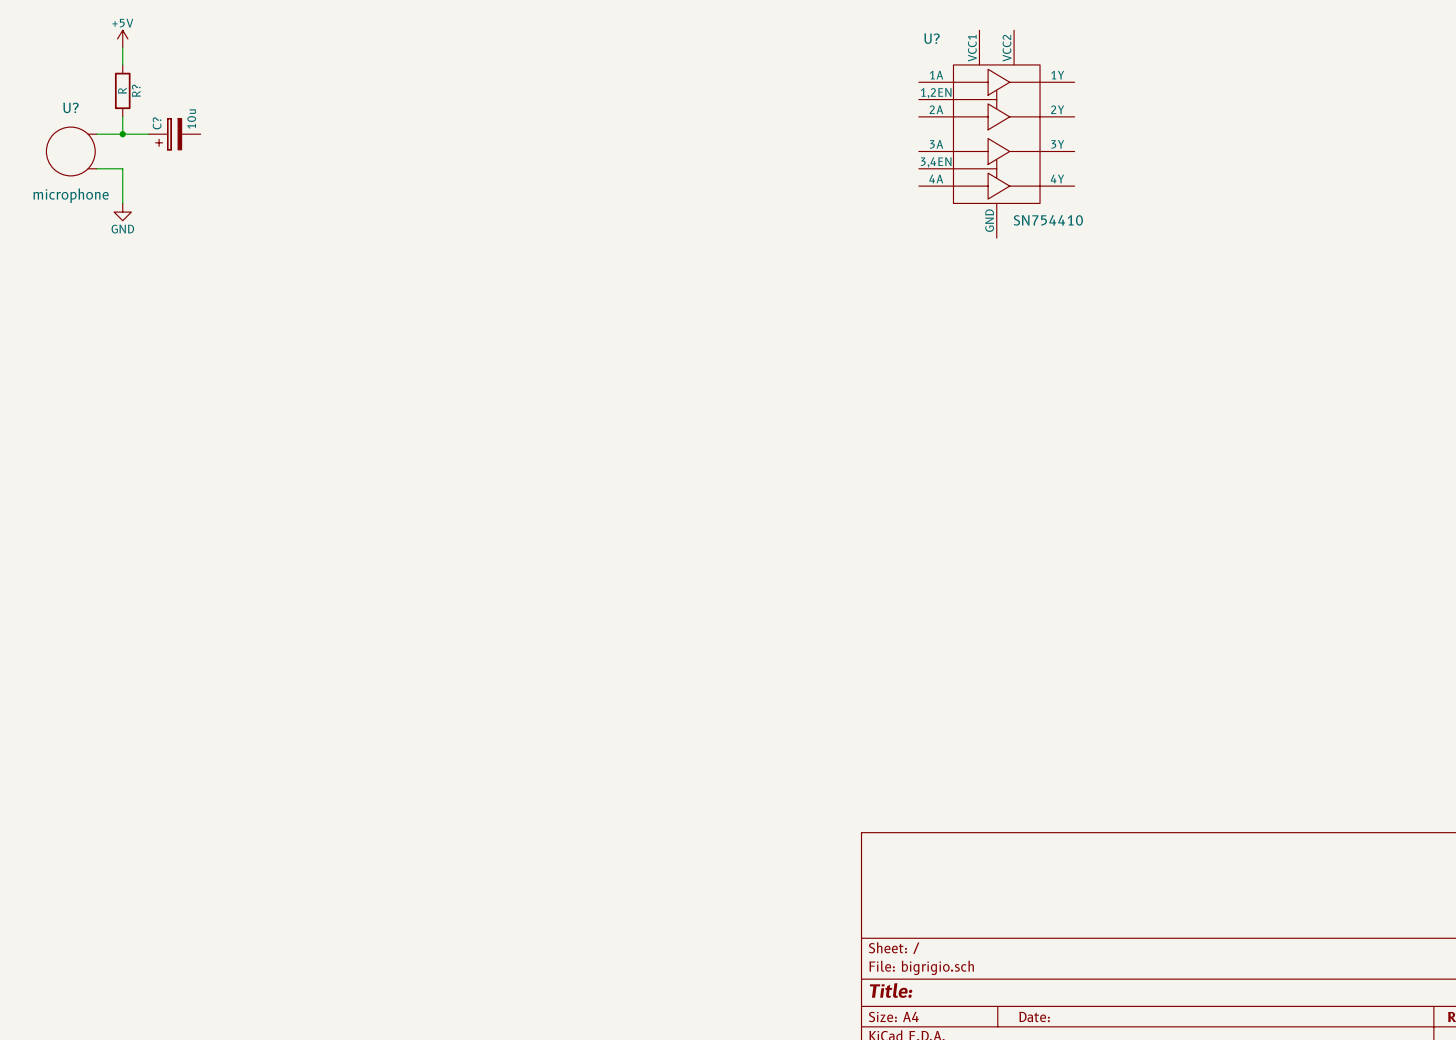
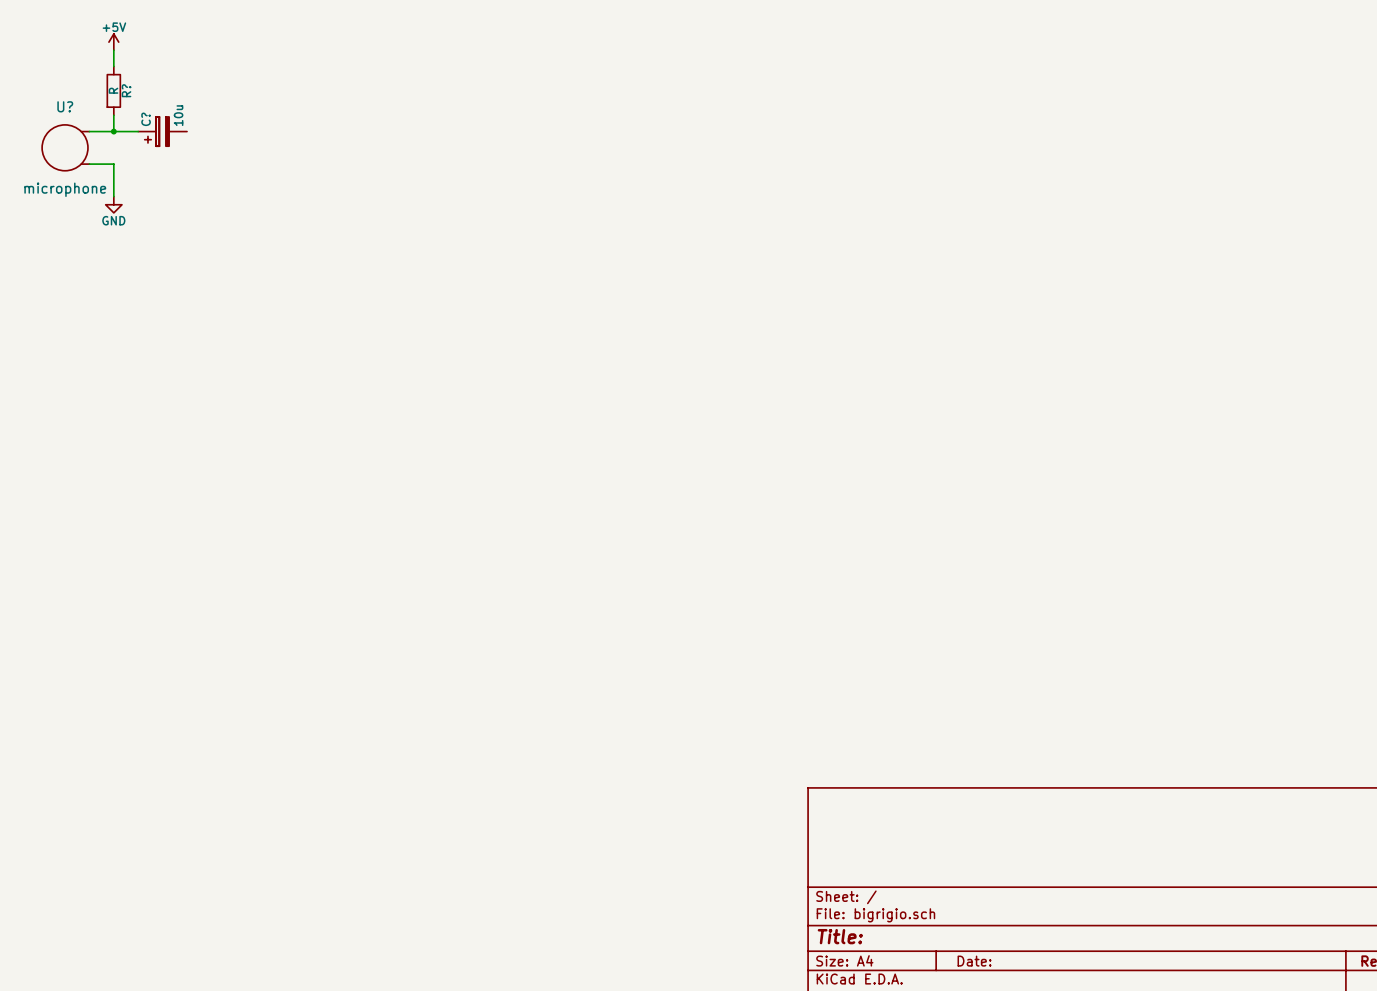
U?: SN754410 (996, 134) -> none

